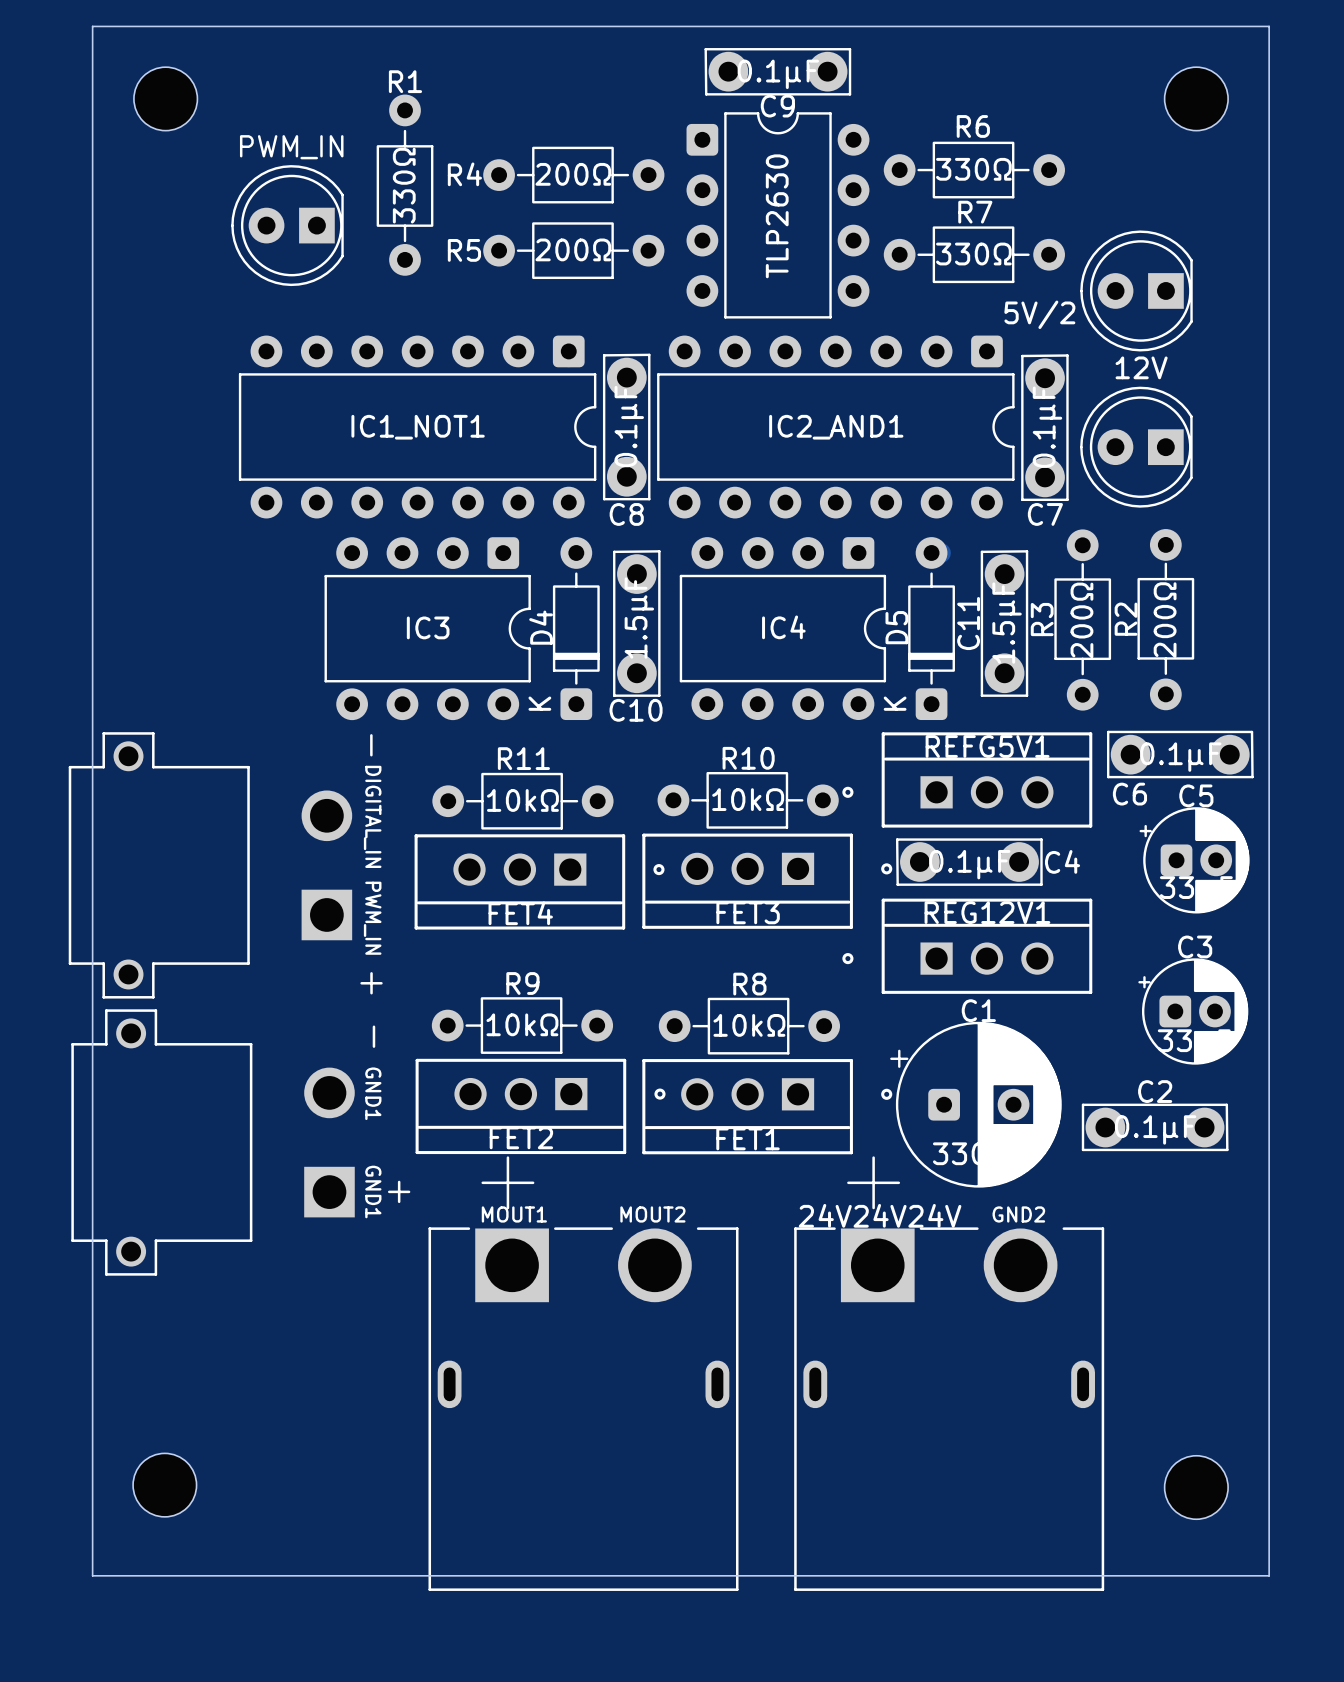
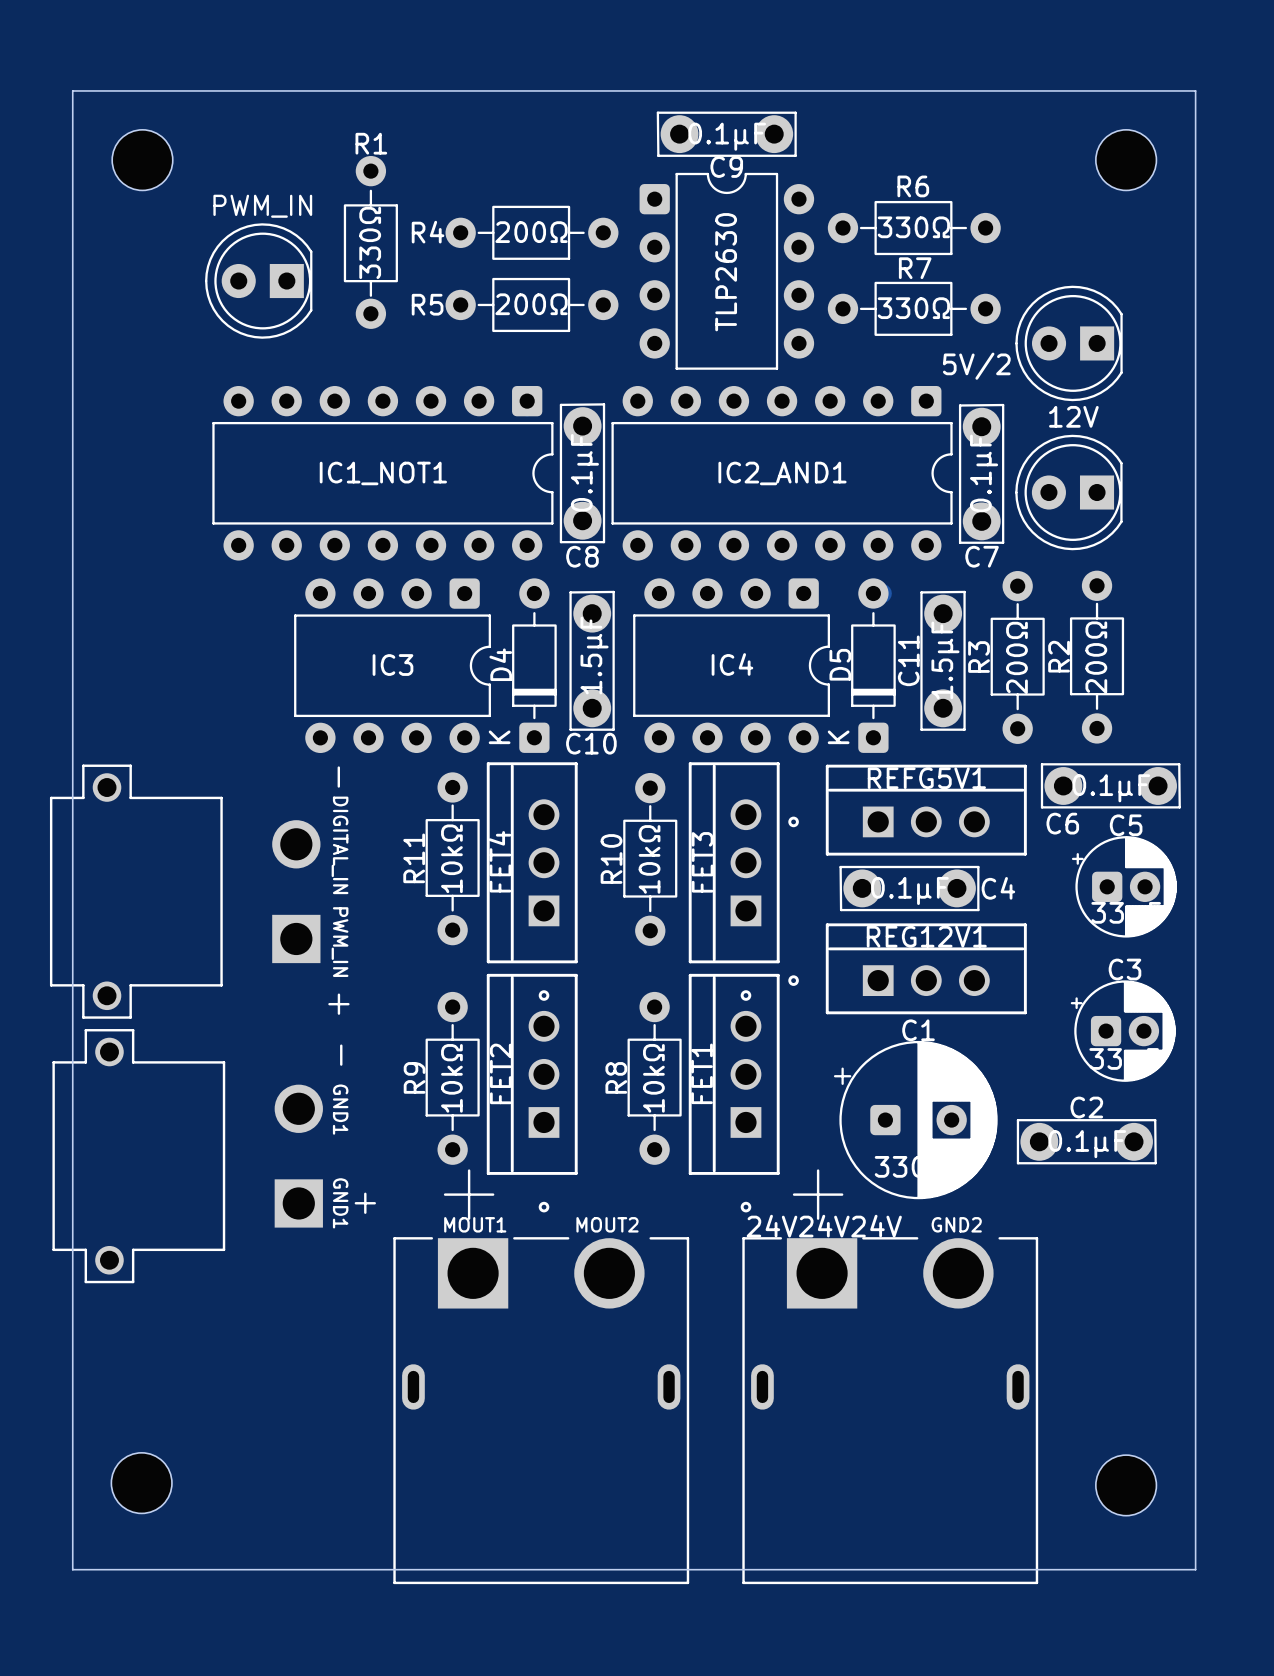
R11 name position: R11 (523, 758) -> R11 (414, 858)
R10 name position: R10 (748, 758) -> R10 (611, 858)
R10 rotation: 0° (748, 800) -> 90° clockwise (650, 859)
R11 rotation: 0° (522, 801) -> 90° clockwise (452, 858)
FET4 rotation: 0° (539, 881) -> 90° clockwise (532, 881)
FET3 rotation: 0° (767, 881) -> 90° clockwise (734, 881)
R9 name position: R9 (522, 983) -> R9 (414, 1077)
R8 name position: R8 (749, 984) -> R8 (616, 1077)
R9 rotation: 0° (522, 1025) -> 90° clockwise (452, 1078)
R8 rotation: 0° (749, 1026) -> 90° clockwise (654, 1078)
FET2 rotation: 0° (540, 1106) -> 90° clockwise (532, 1093)
FET1 rotation: 0° (767, 1106) -> 90° clockwise (734, 1093)

